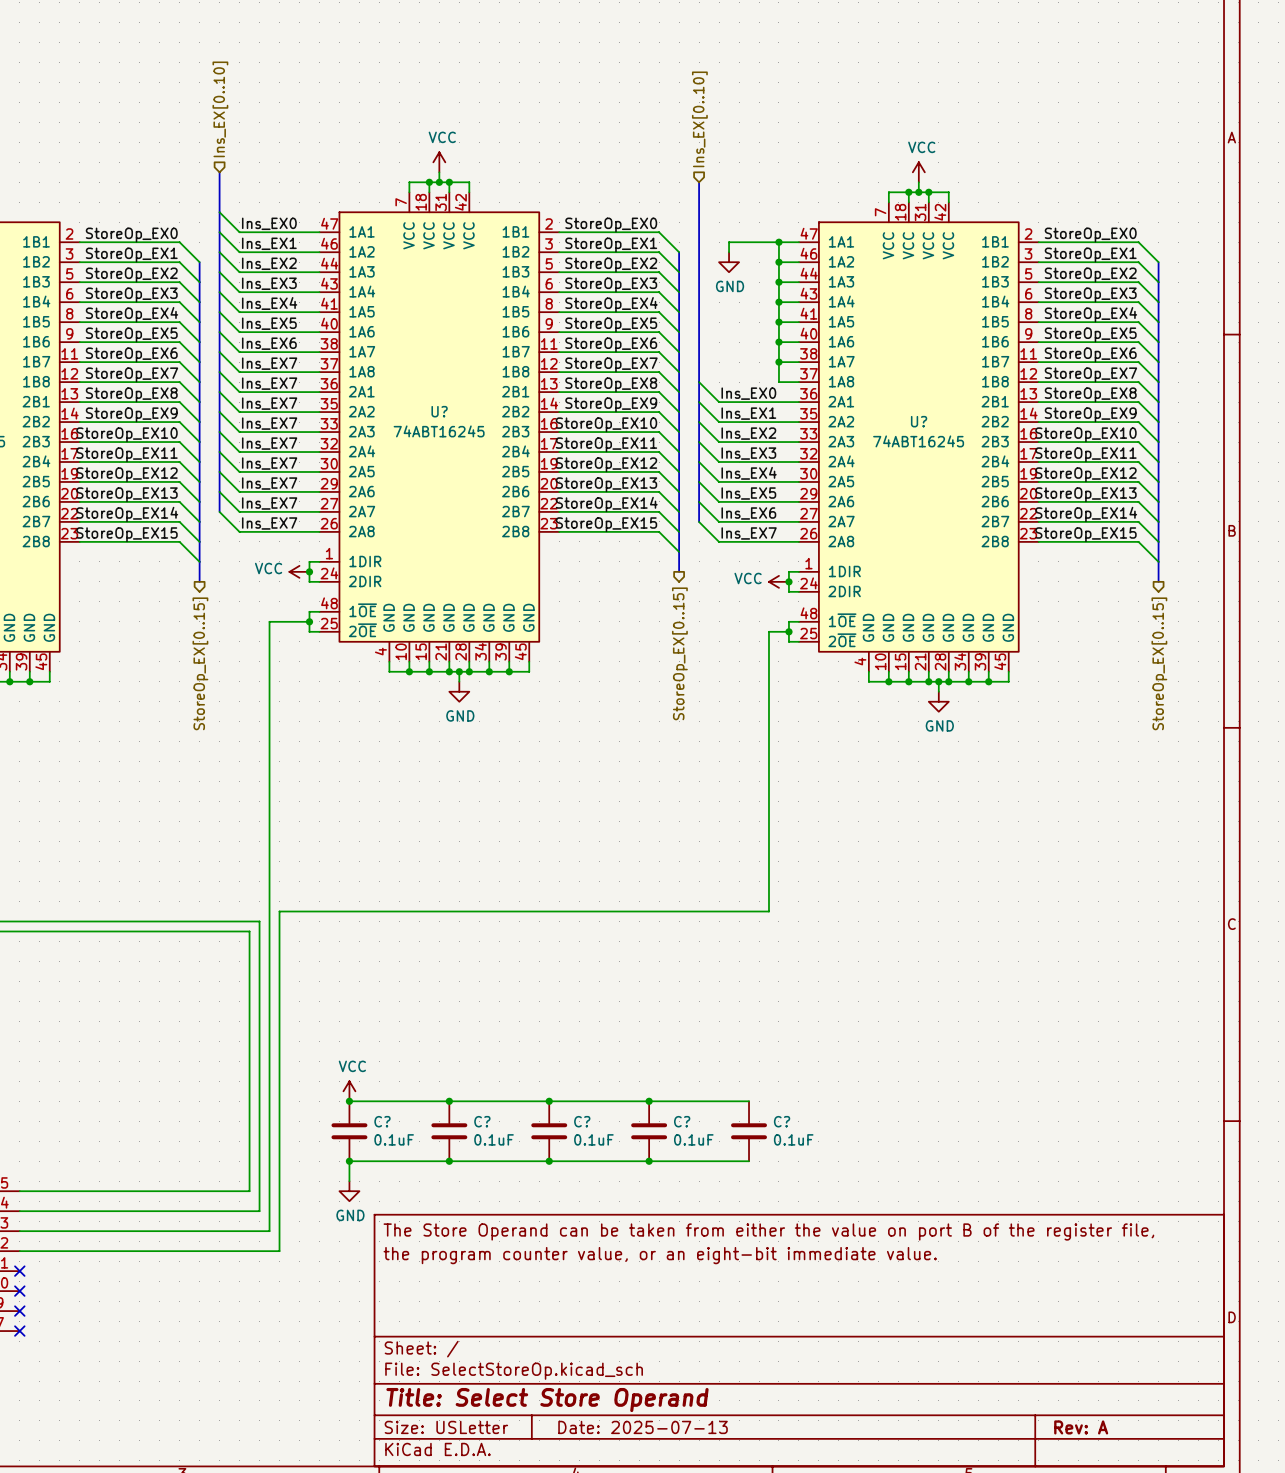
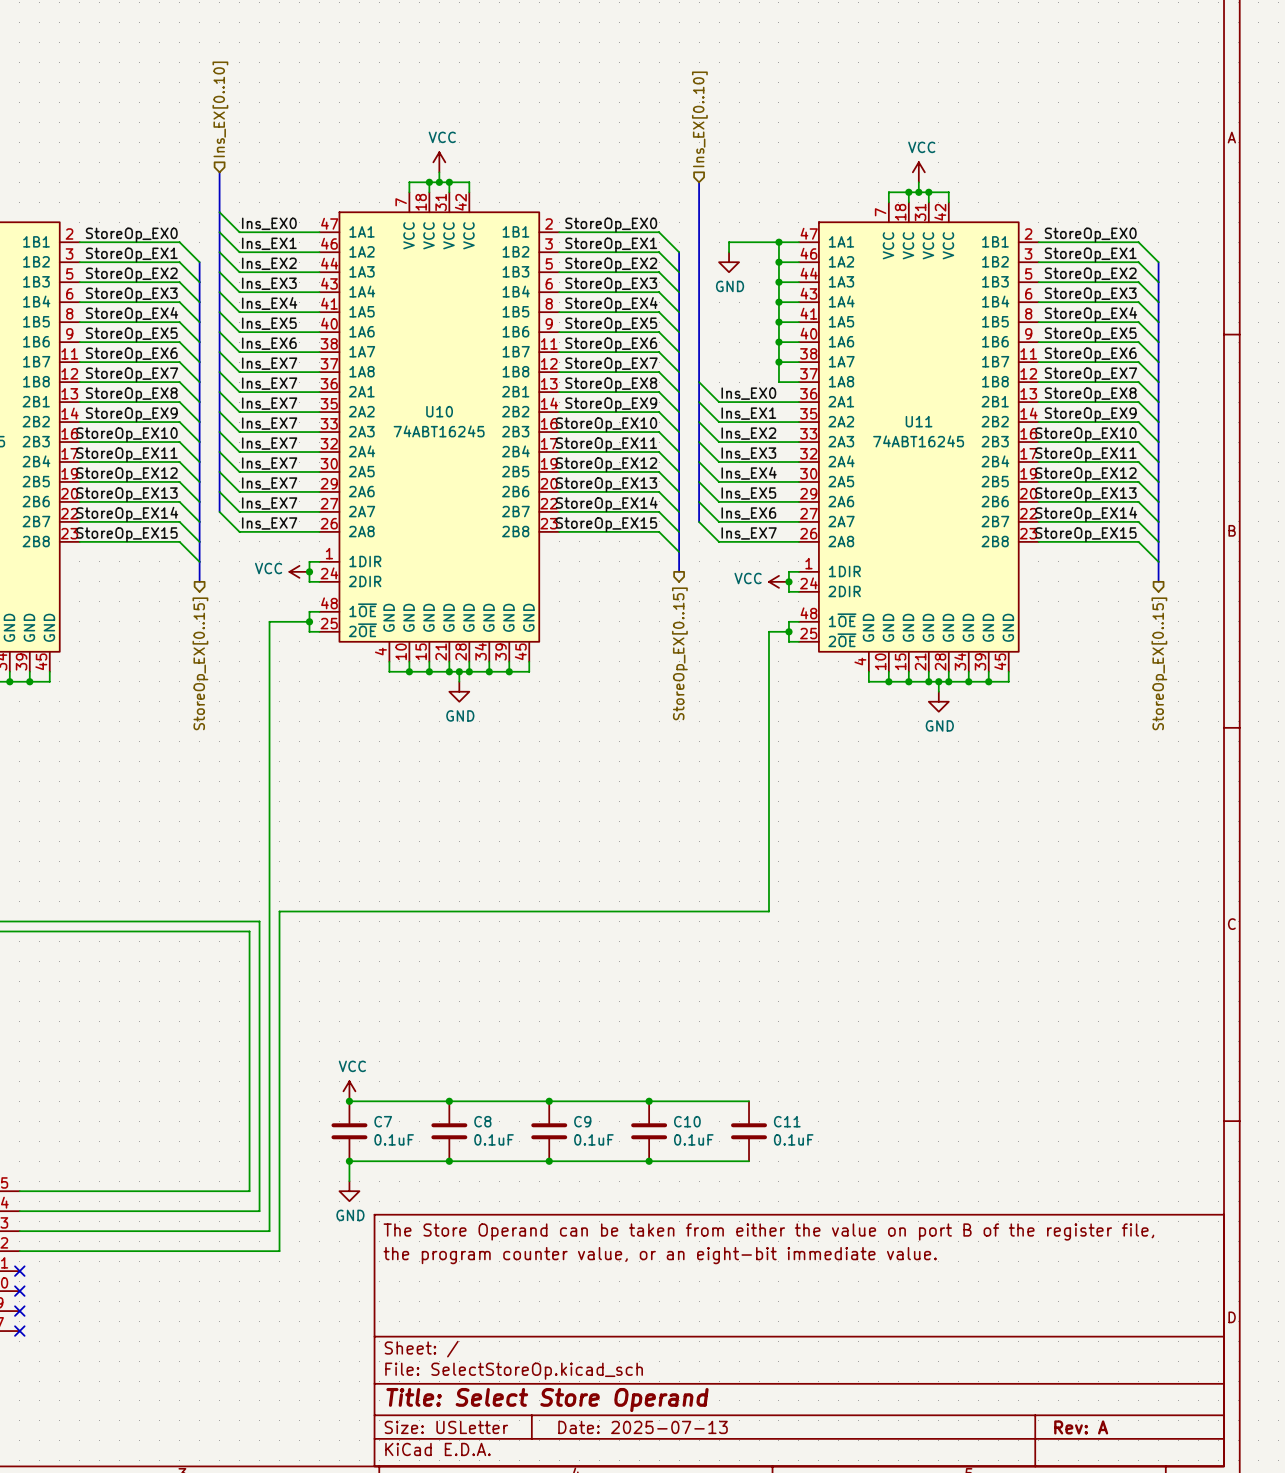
U? name: U? (439, 411) -> U10 (439, 411)
U? name: U? (919, 421) -> U11 (919, 421)
C? name: C? (382, 1121) -> C7 (383, 1121)
C? name: C? (482, 1121) -> C8 (482, 1121)
C? name: C? (582, 1121) -> C9 (582, 1121)
C? name: C? (682, 1121) -> C10 (687, 1121)
C? name: C? (782, 1121) -> C11 (787, 1121)

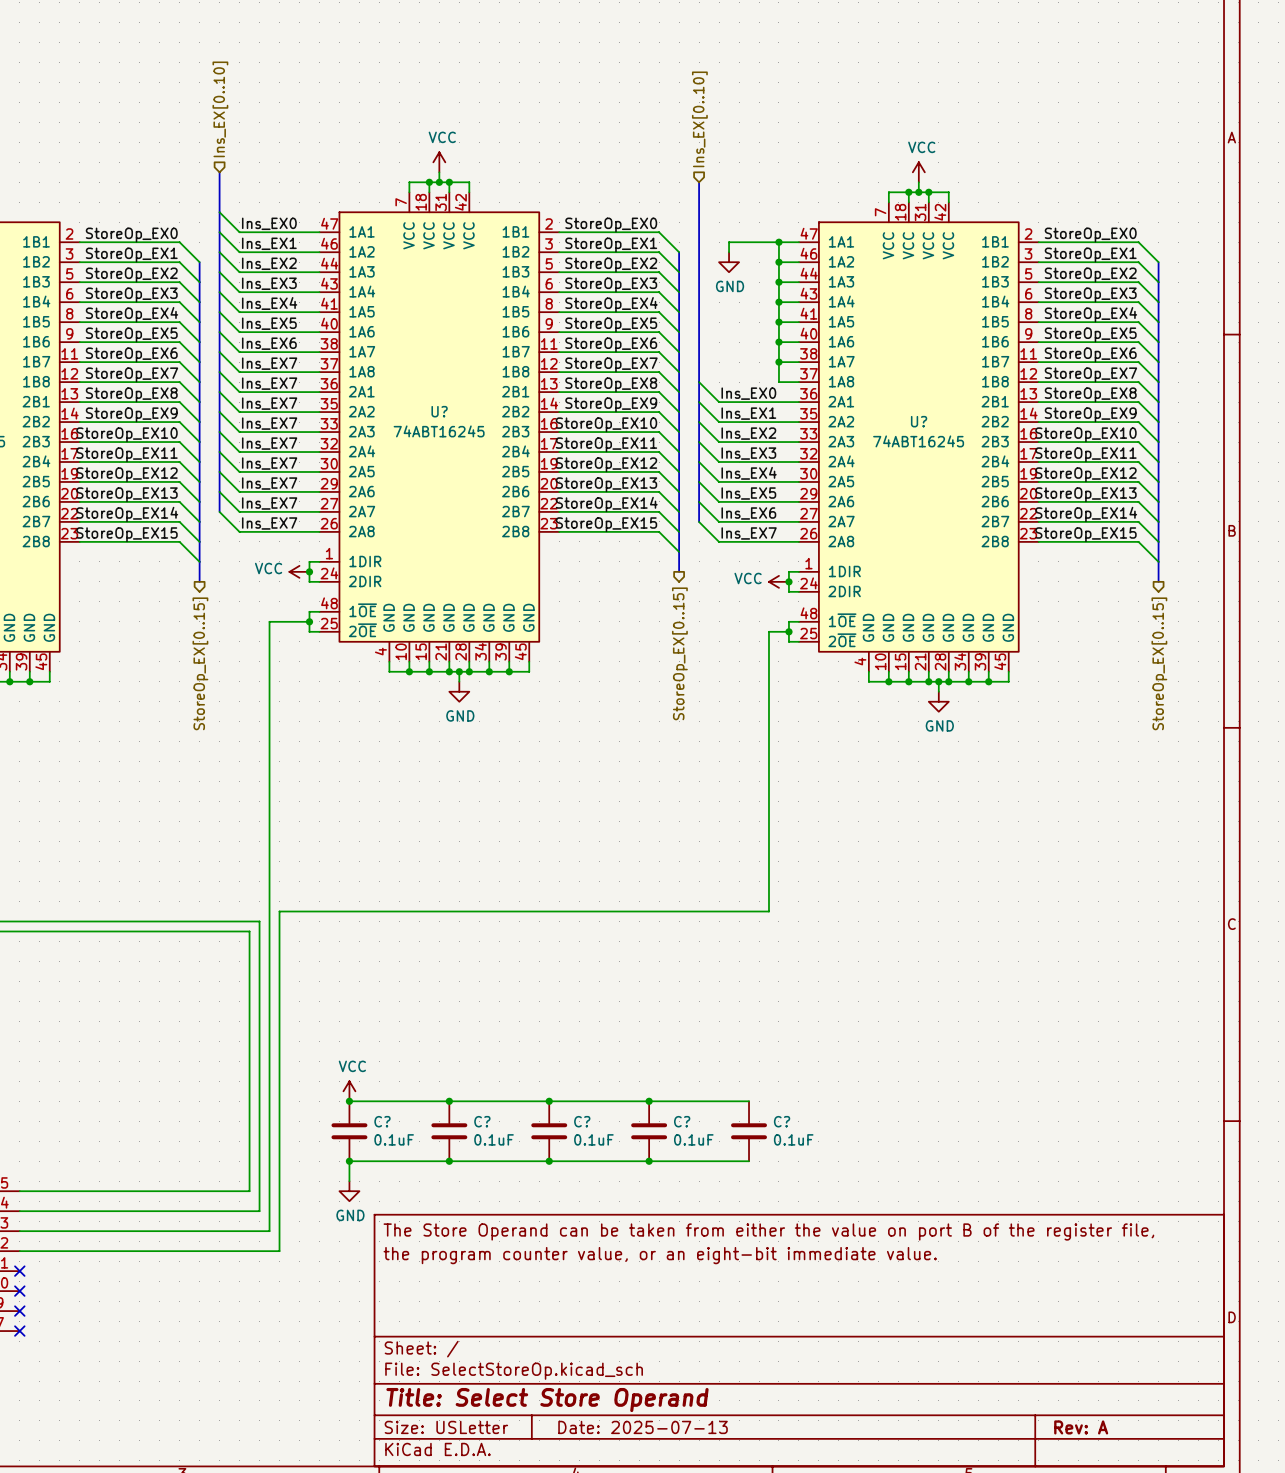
U10 name: U10 (439, 411) -> U? (439, 411)
U11 name: U11 (919, 421) -> U? (919, 421)
C7 name: C7 (383, 1121) -> C? (382, 1121)
C8 name: C8 (482, 1121) -> C? (482, 1121)
C9 name: C9 (582, 1121) -> C? (582, 1121)
C10 name: C10 (687, 1121) -> C? (682, 1121)
C11 name: C11 (787, 1121) -> C? (782, 1121)

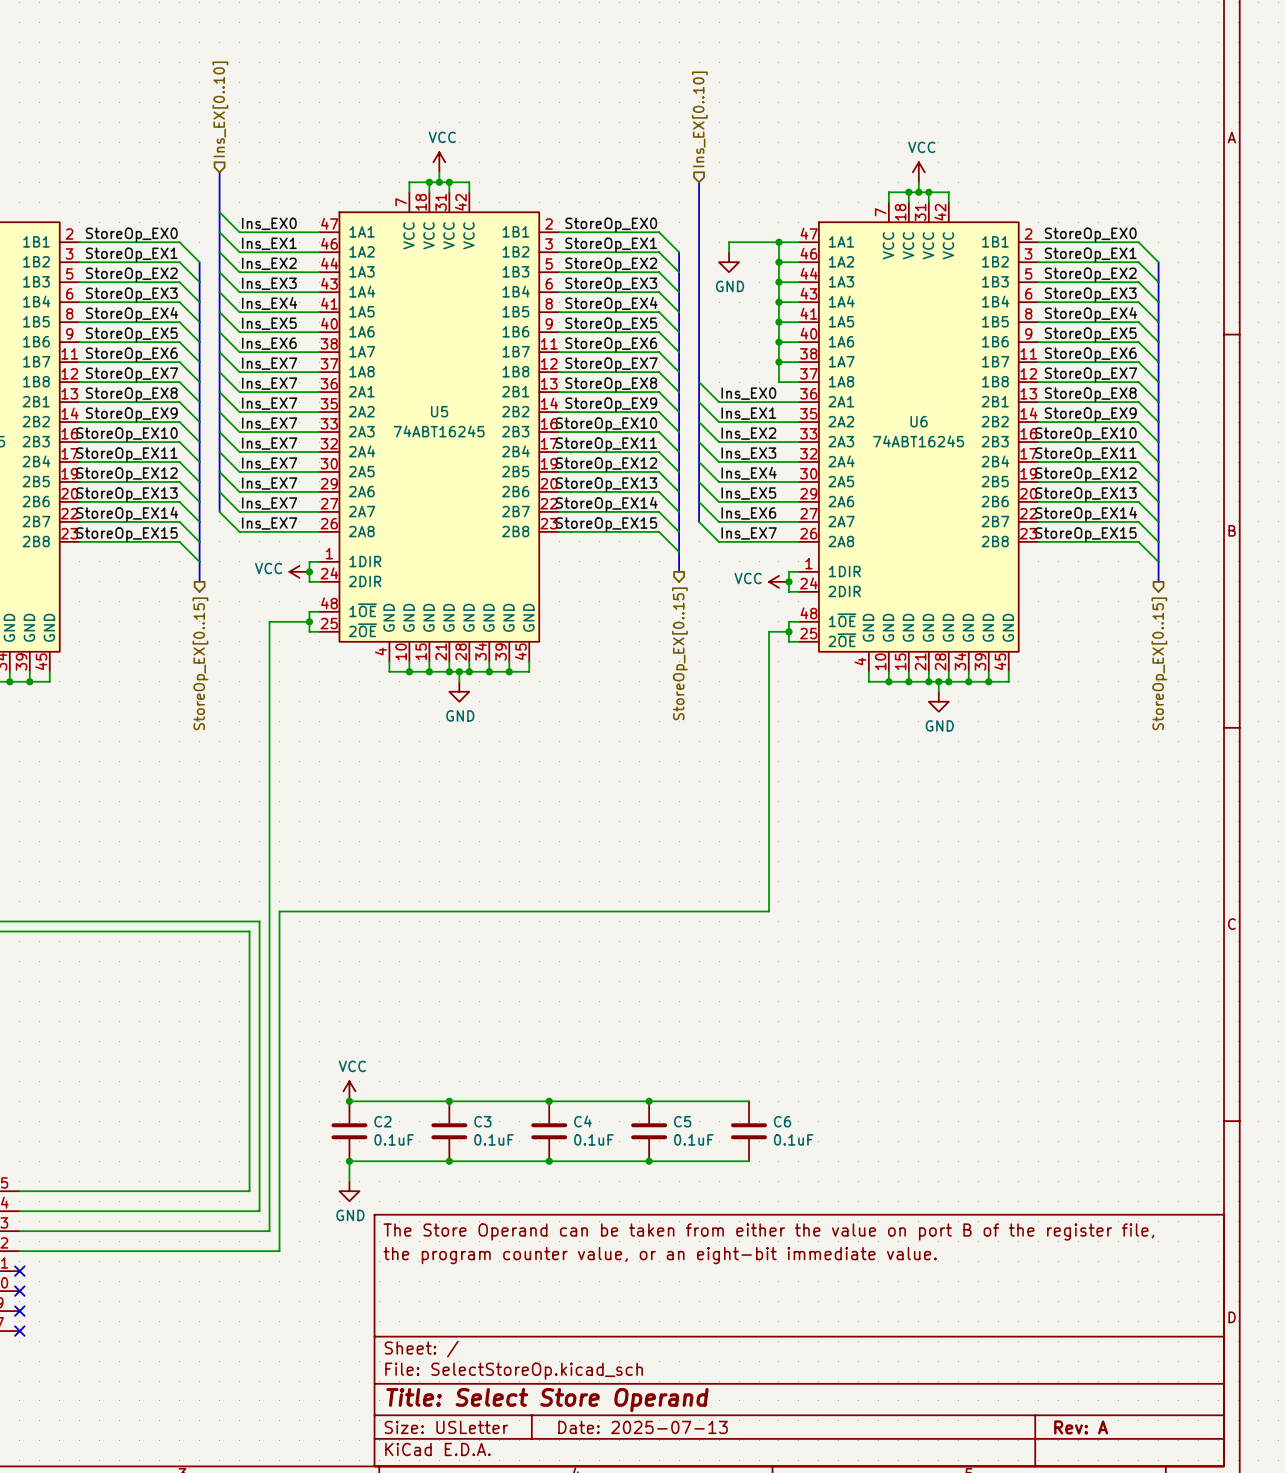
U? name: U? (439, 411) -> U5 (439, 411)
U? name: U? (919, 421) -> U6 (919, 421)
C? name: C? (382, 1121) -> C2 (382, 1121)
C? name: C? (482, 1121) -> C3 (482, 1121)
C? name: C? (582, 1121) -> C4 (582, 1121)
C? name: C? (682, 1121) -> C5 (682, 1121)
C? name: C? (782, 1121) -> C6 (782, 1121)

